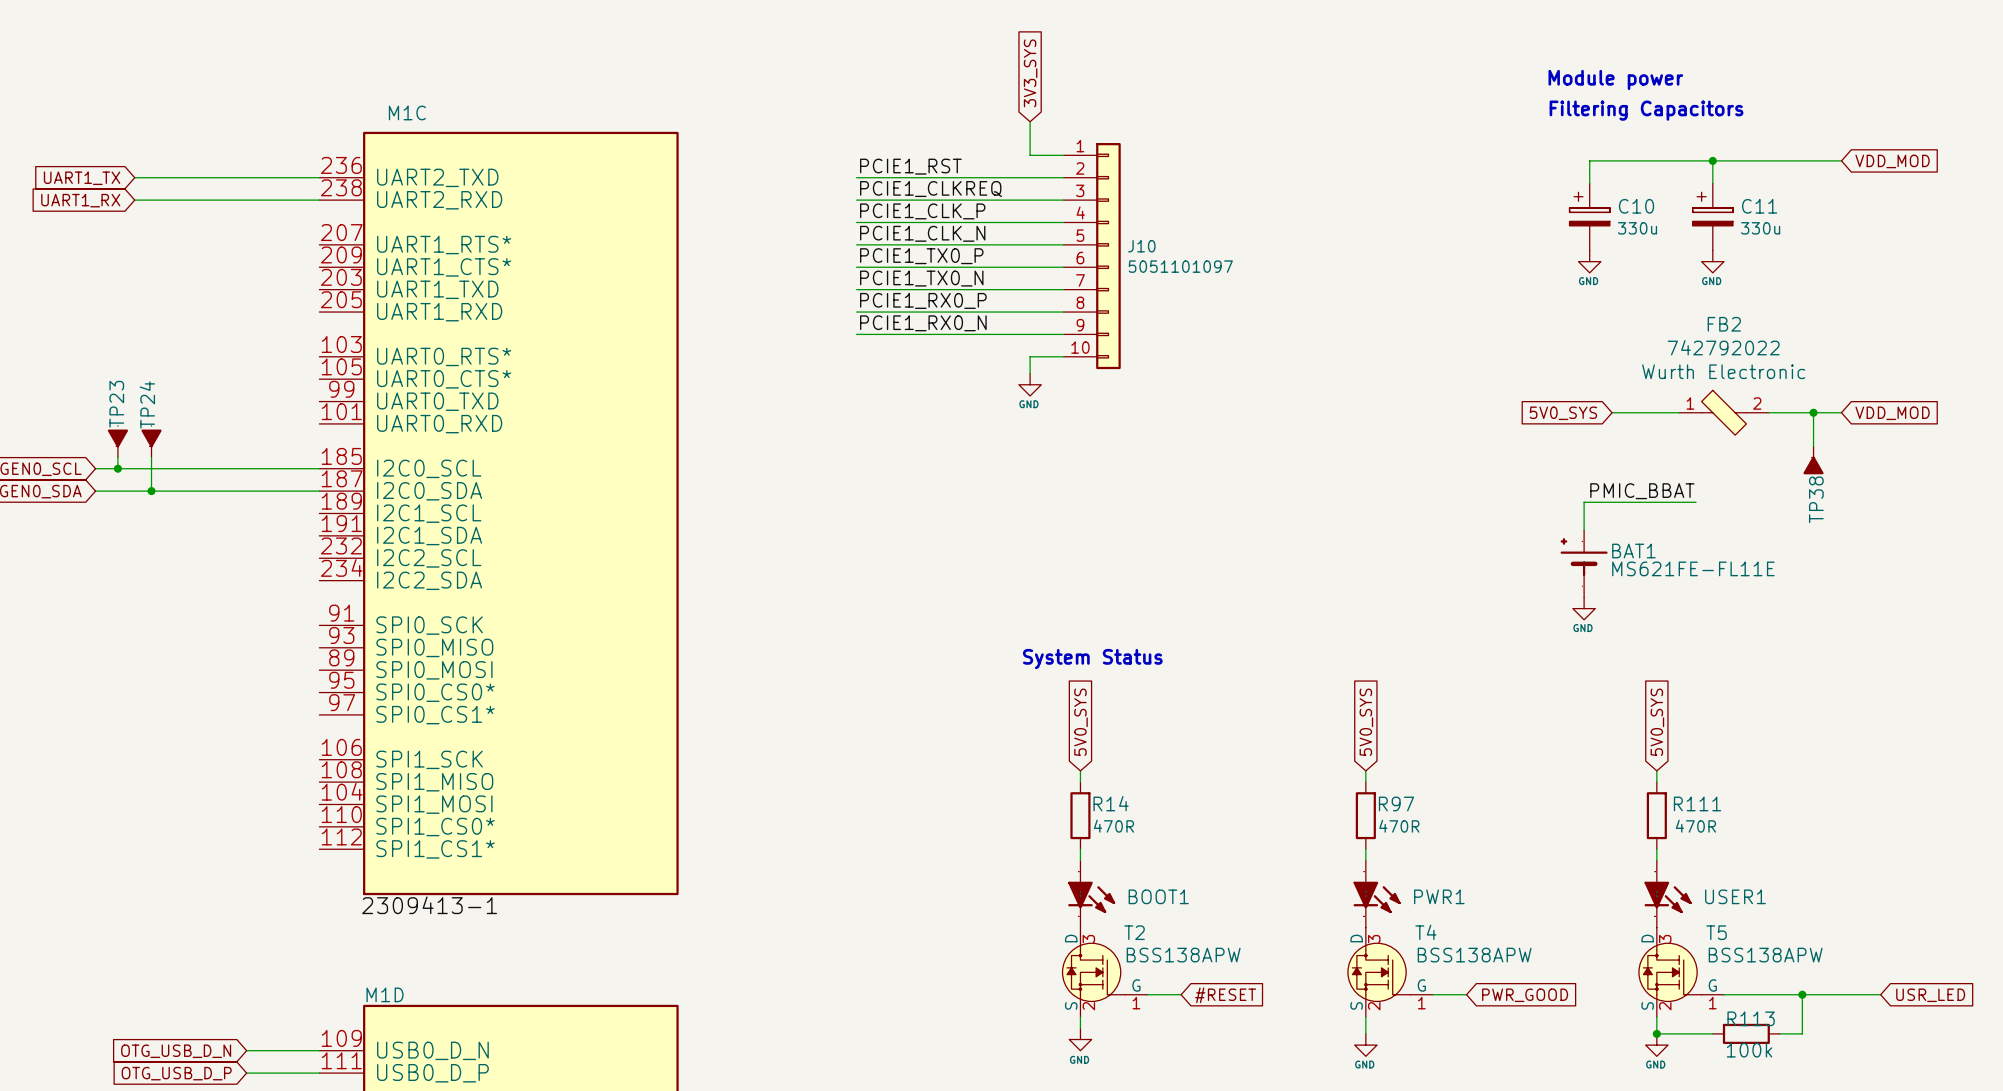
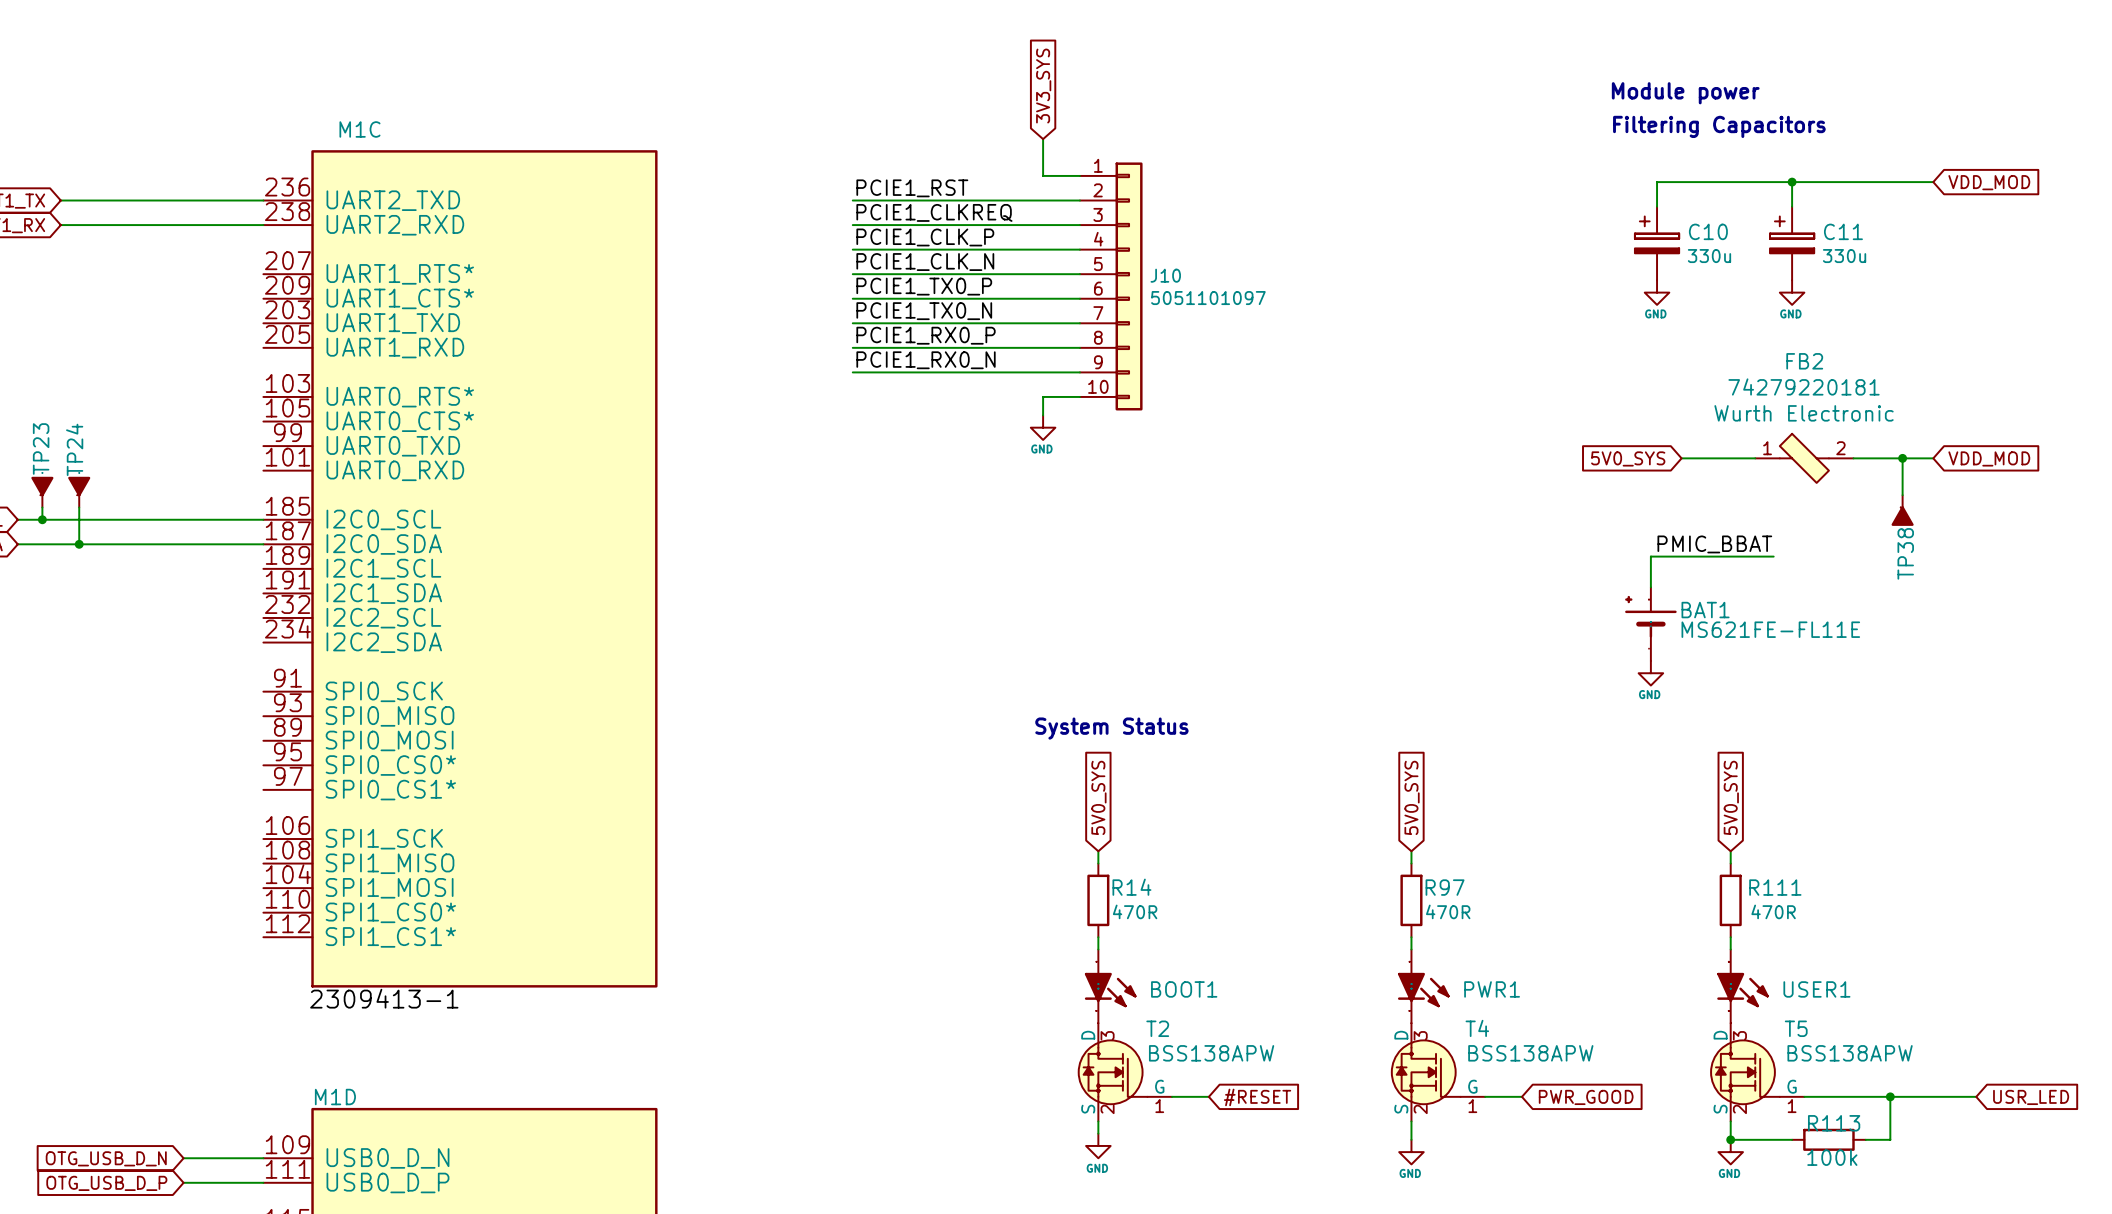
FB2 text: 742792022 (1723, 347) -> 74279220181 (1804, 386)

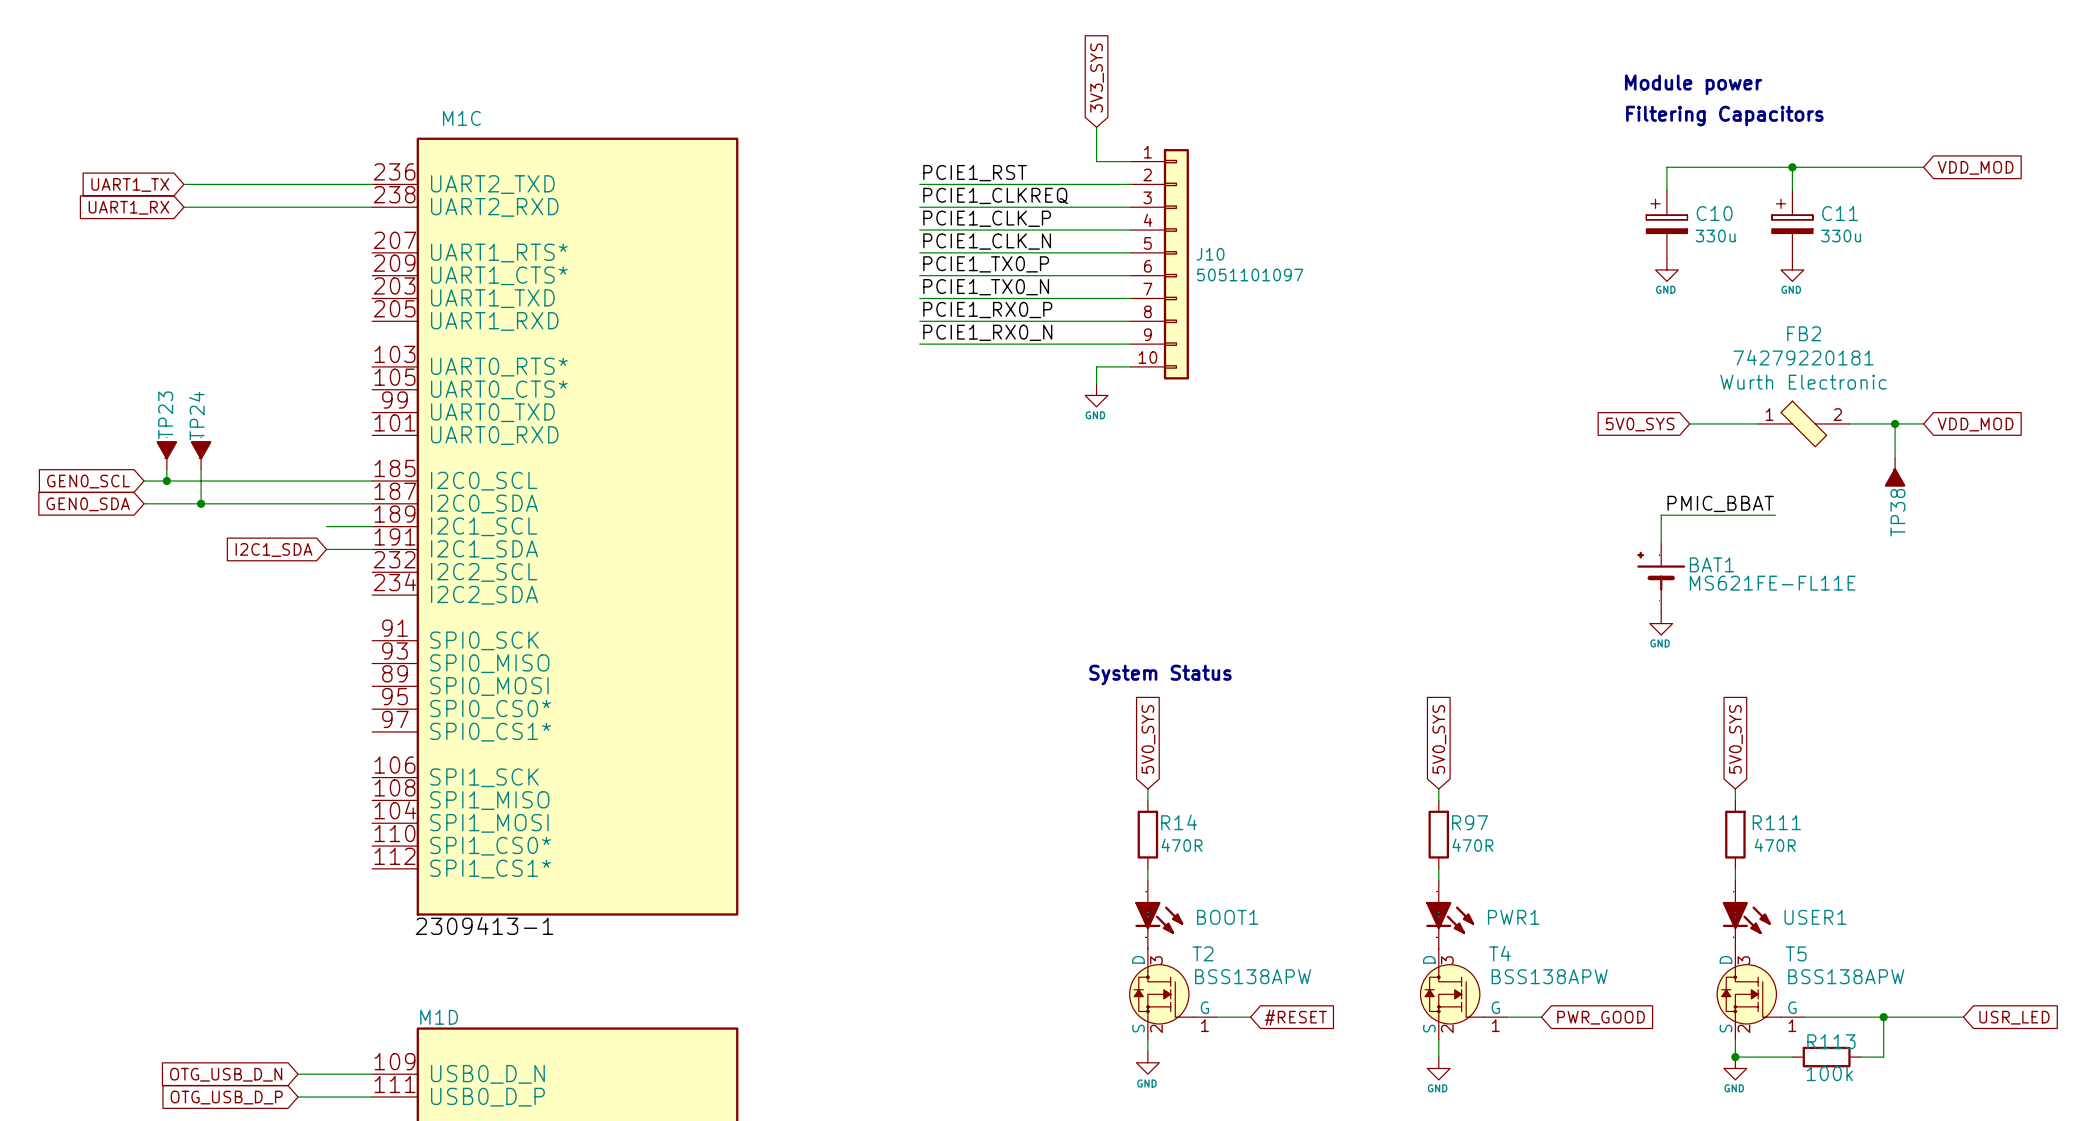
wire: none -> (326, 526) (372, 526)
wire: none -> (326, 549) (372, 549)
global label: none -> I2C1_SDA (273, 549)

